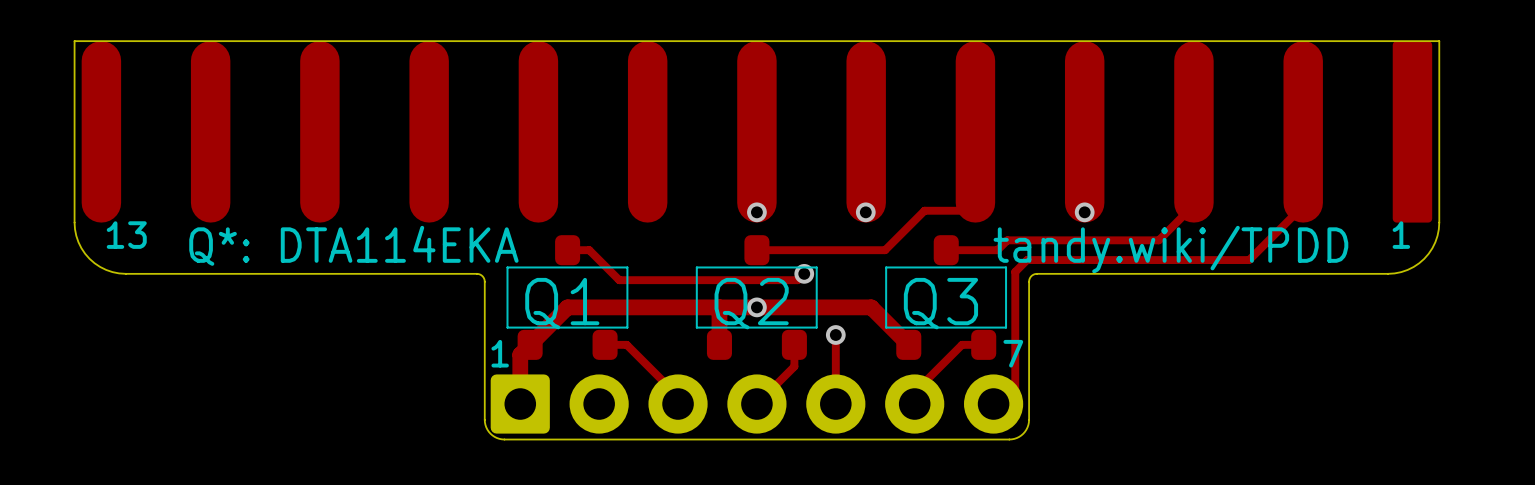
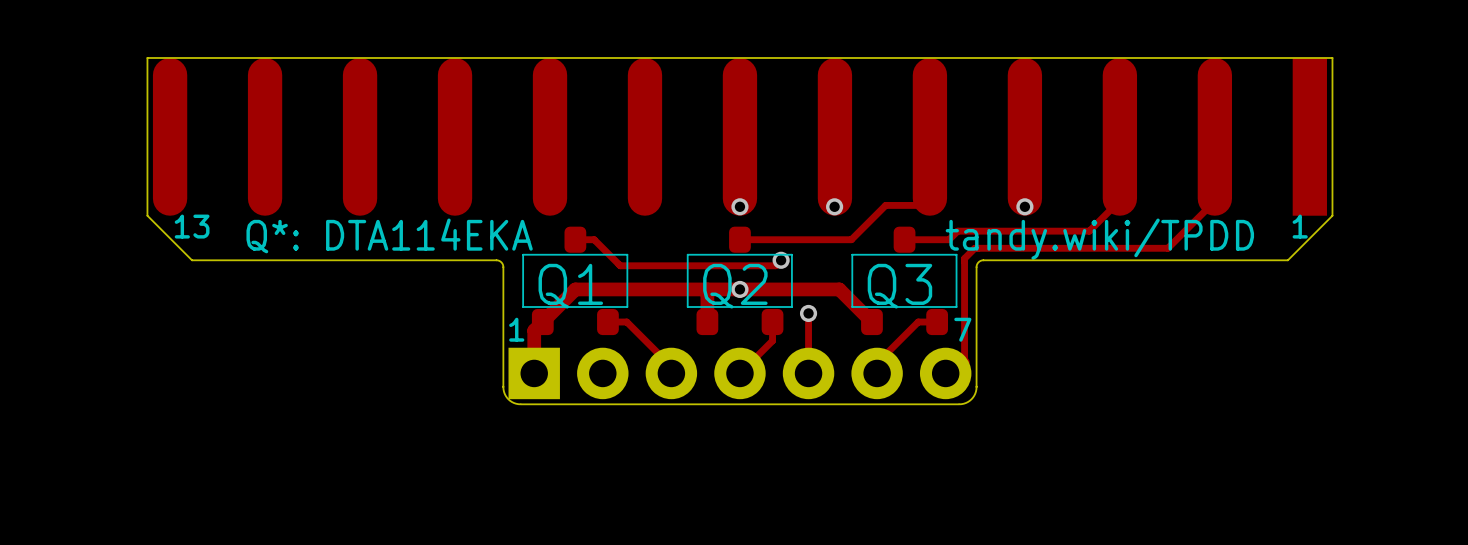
board edge: (74, 41) (74, 222) (76, 235) (81, 248) (94, 263) (112, 272) (125, 273) -> (147, 57) (147, 215) (192, 260)
part footprint: [81, 41, 1433, 223] -> [152, 57, 1327, 216]
board edge: (1439, 41) (1439, 222) (1437, 235) (1428, 253) (1419, 263) (1407, 269) (1388, 273) -> (1332, 57) (1332, 215) (1287, 260)
part footprint: [490, 374, 1024, 434] -> [508, 347, 972, 400]

